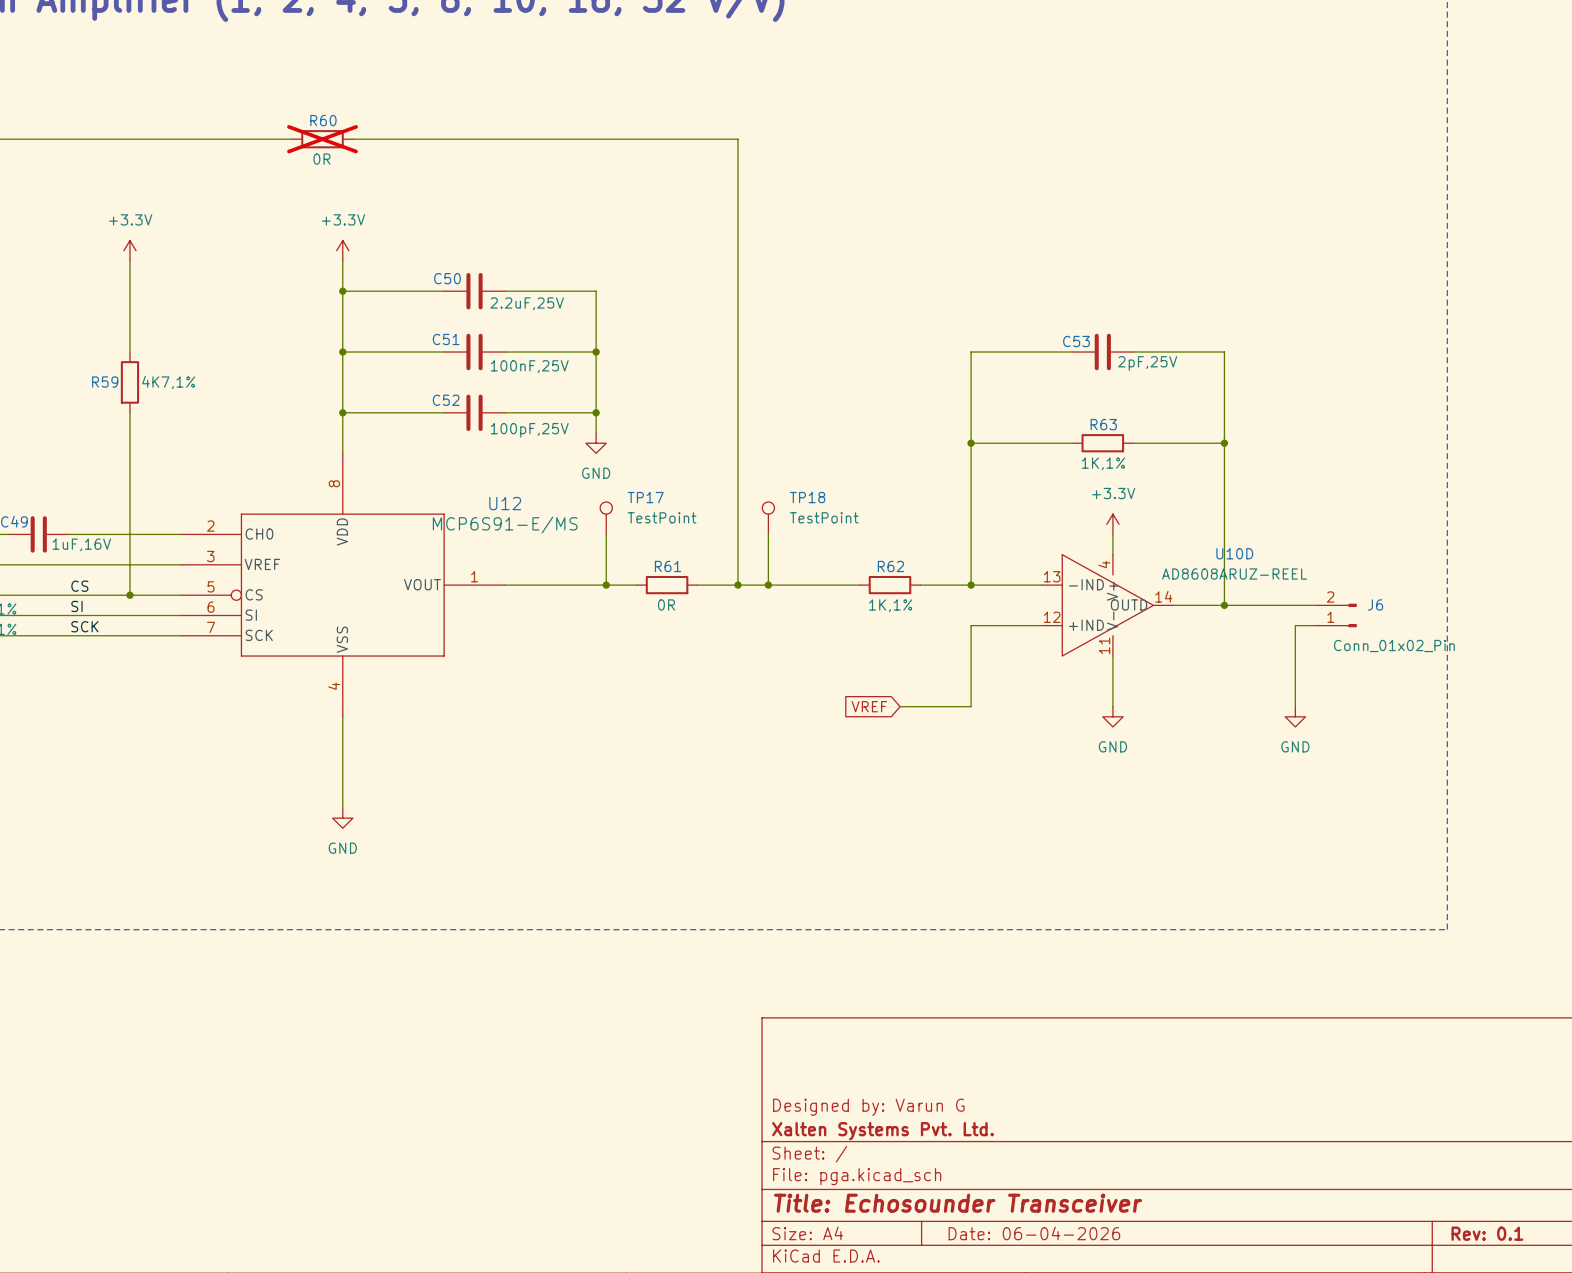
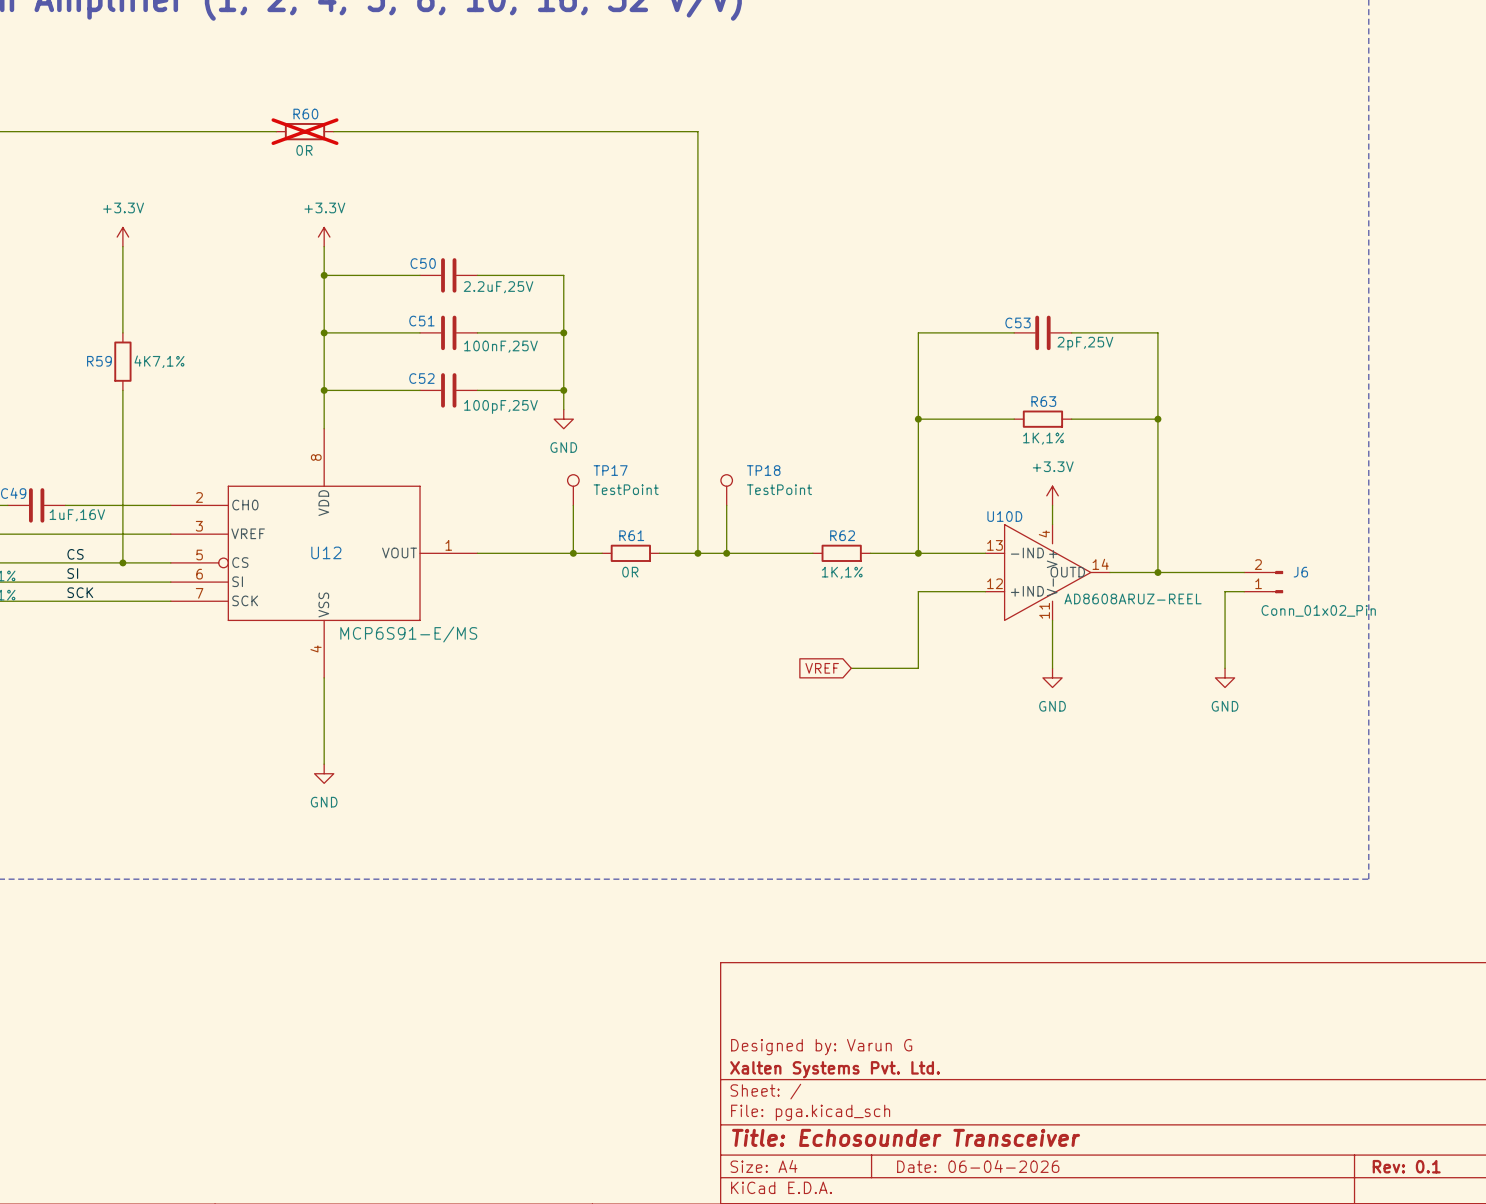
U12 name position: U12 (505, 503) -> U12 (326, 552)
U12 value position: MCP6S91-E/MS (505, 524) -> MCP6S91-E/MS (408, 634)
U10D name position: U10D (1234, 553) -> U10D (1004, 516)
U10D value position: AD8608ARUZ-REEL (1234, 574) -> AD8608ARUZ-REEL (1133, 598)

